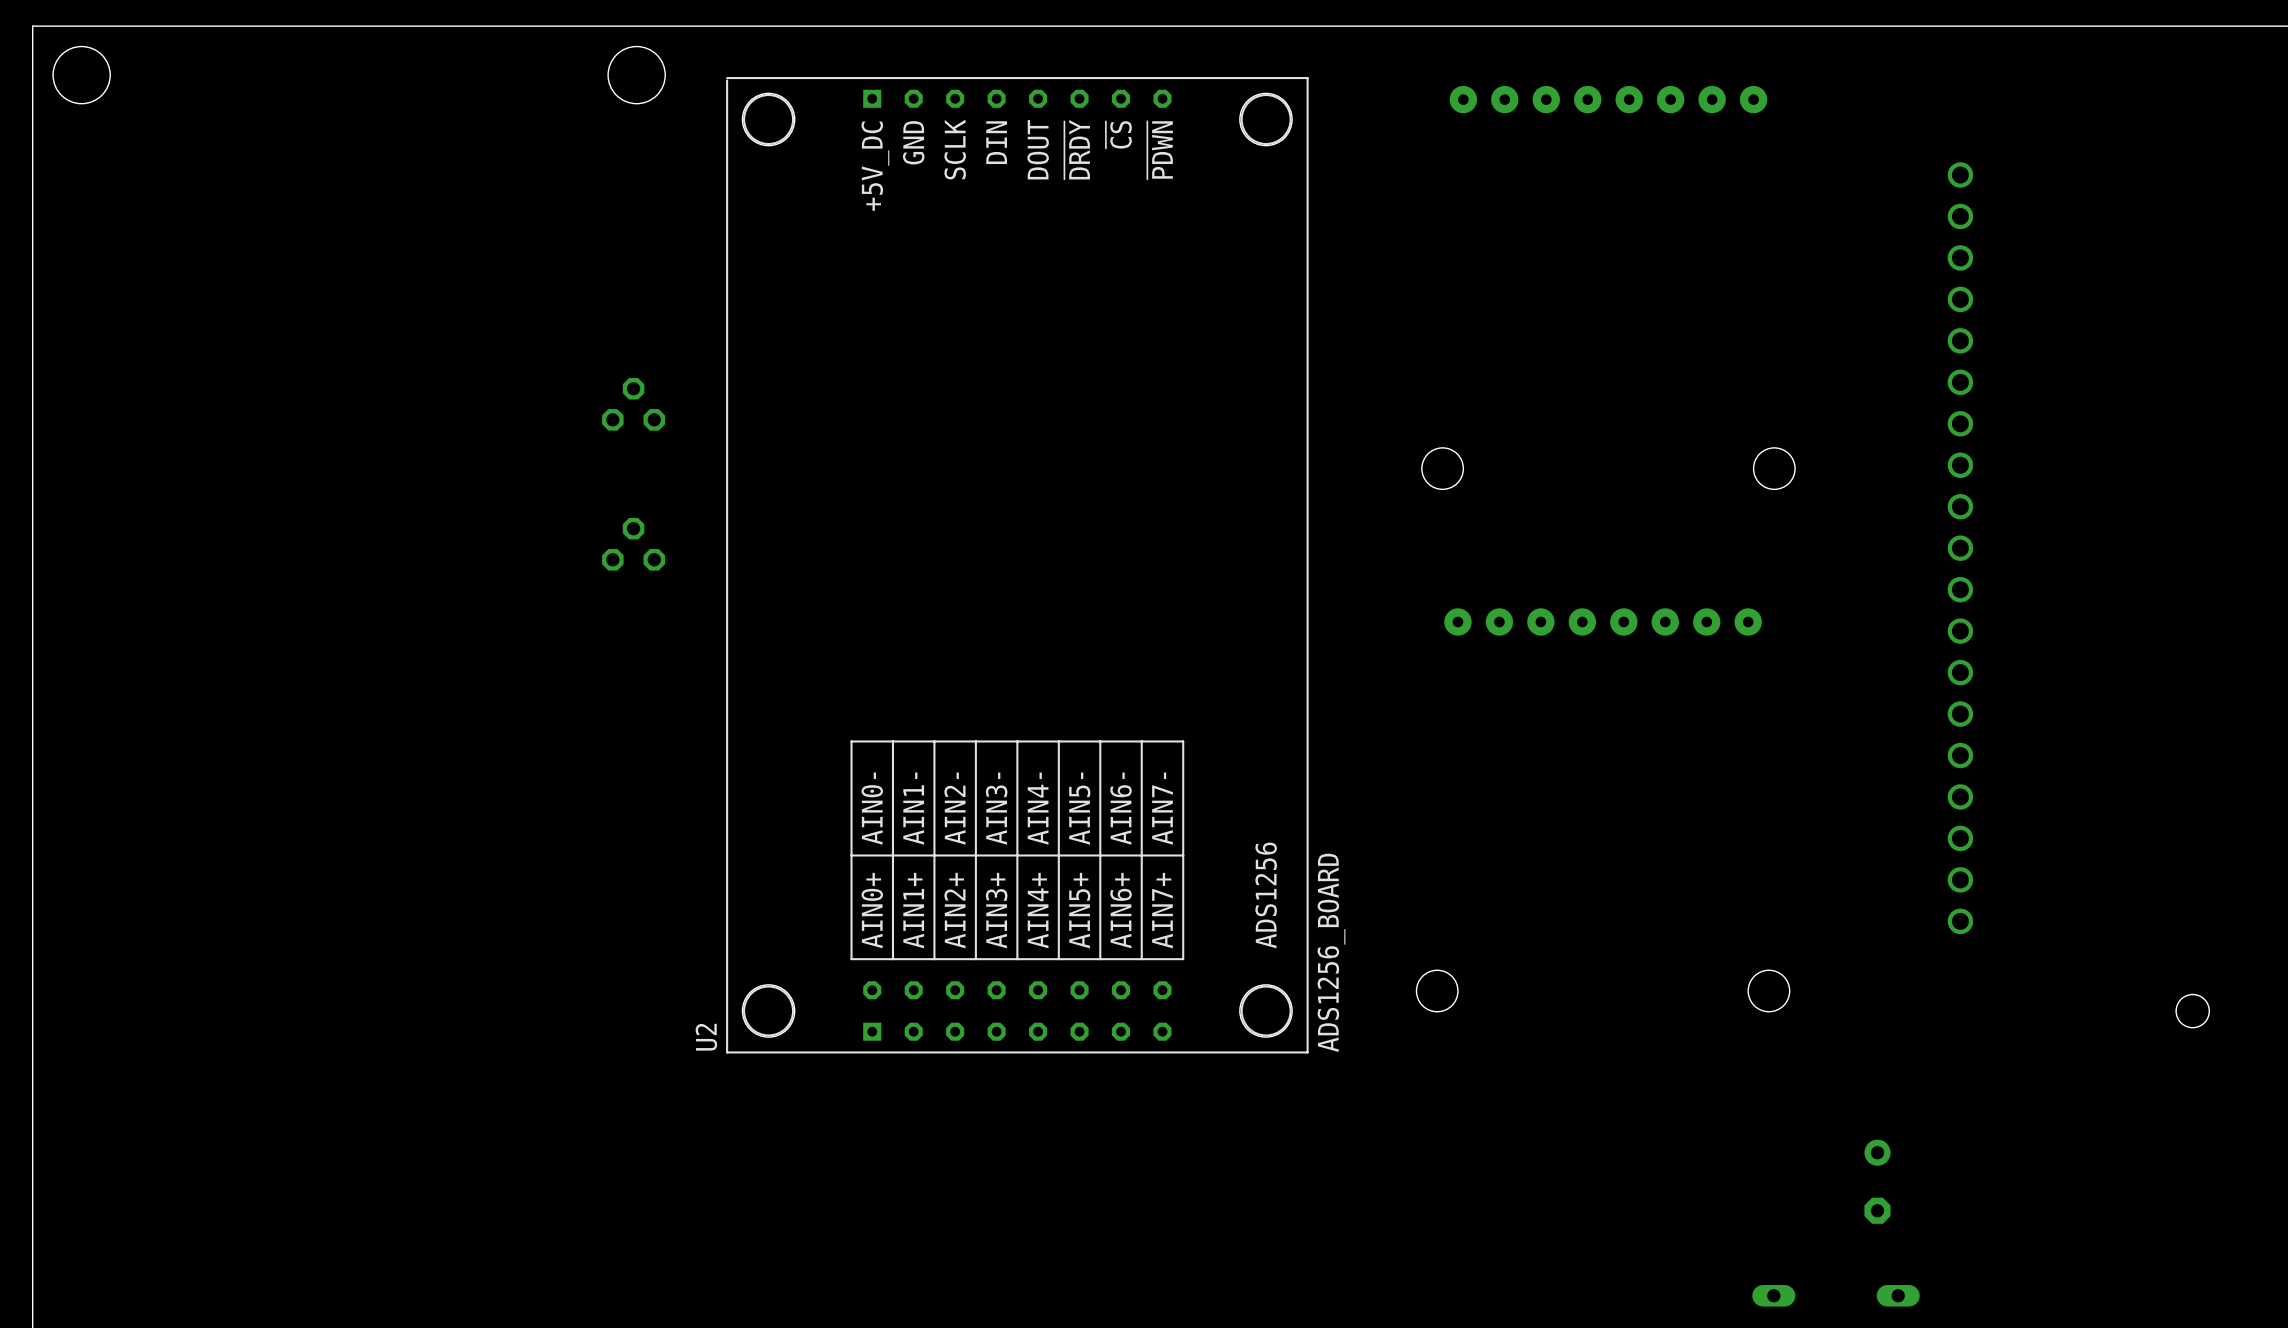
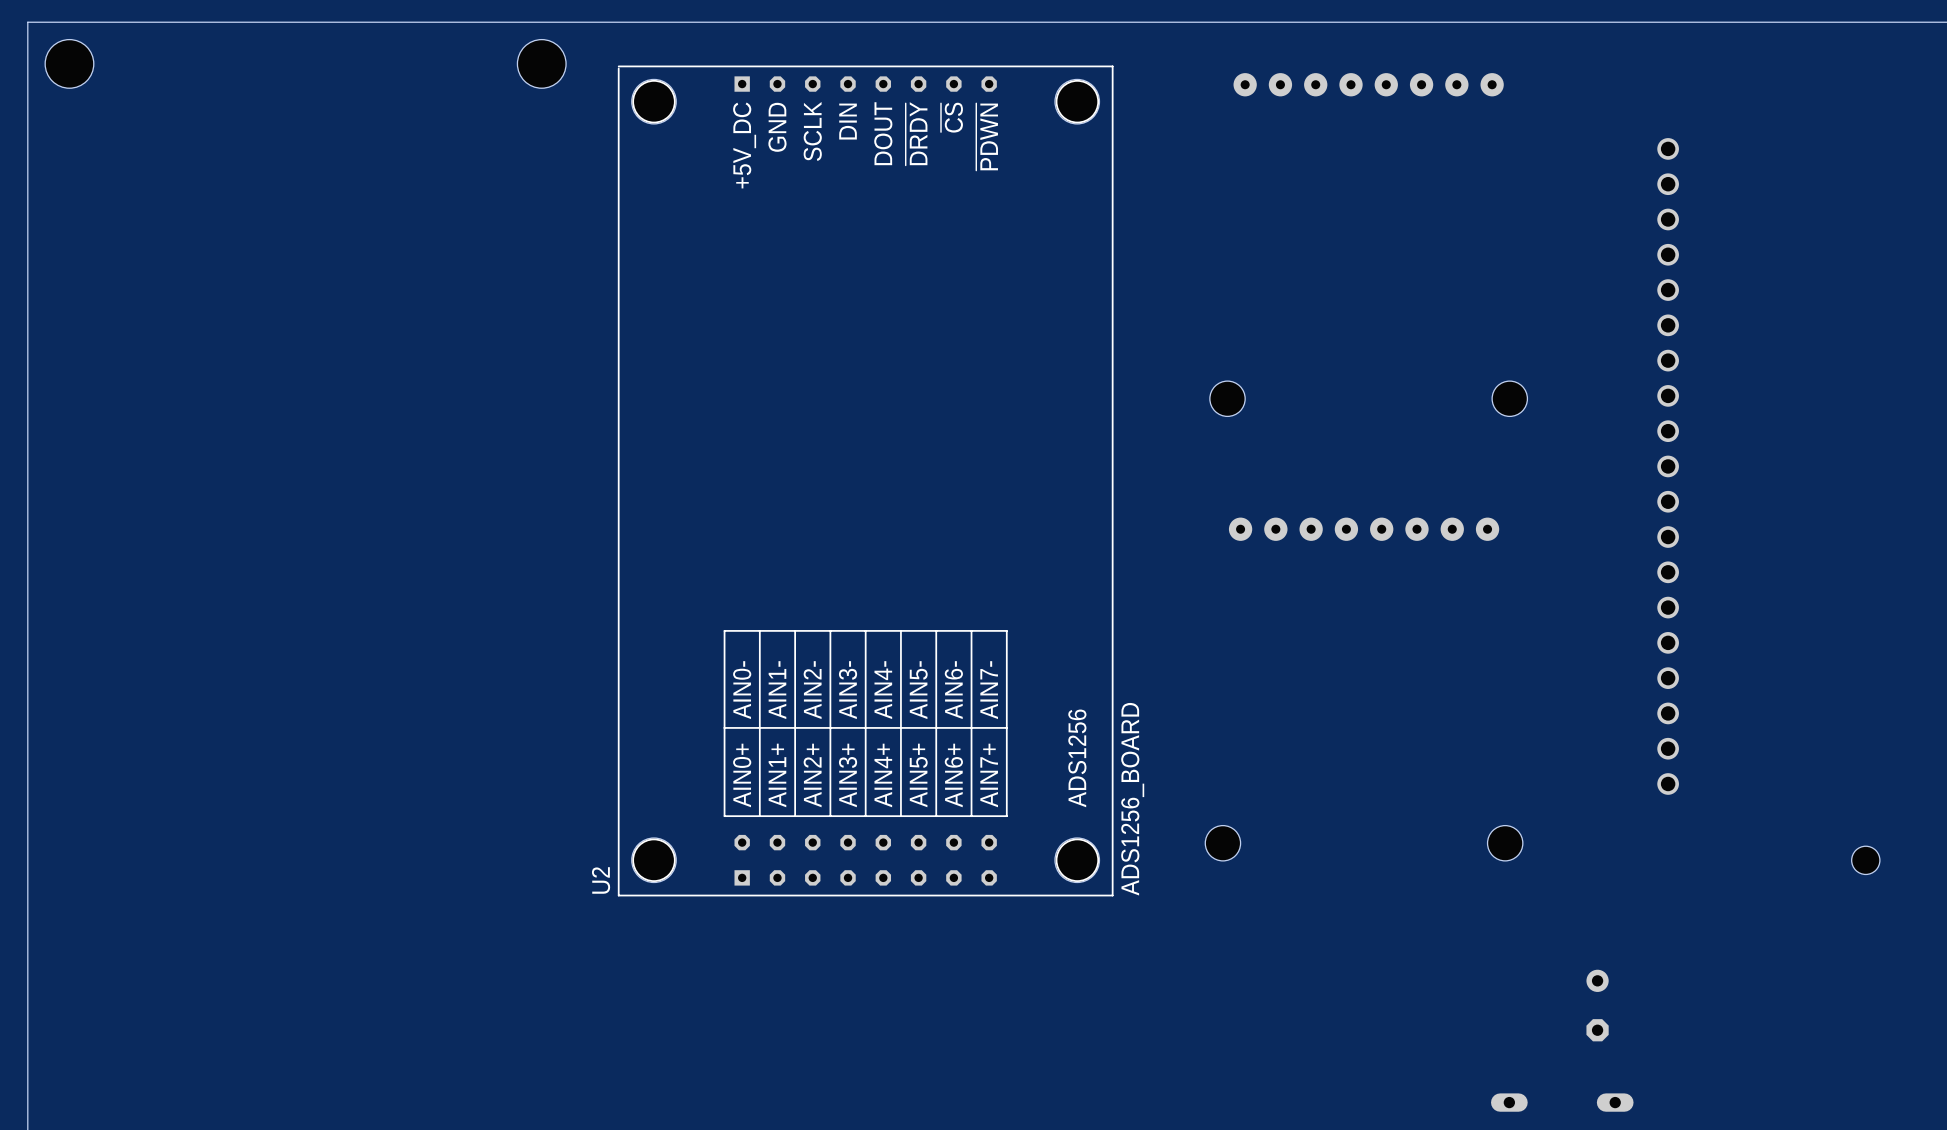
part: (633, 404) -> none
part: (633, 544) -> none

